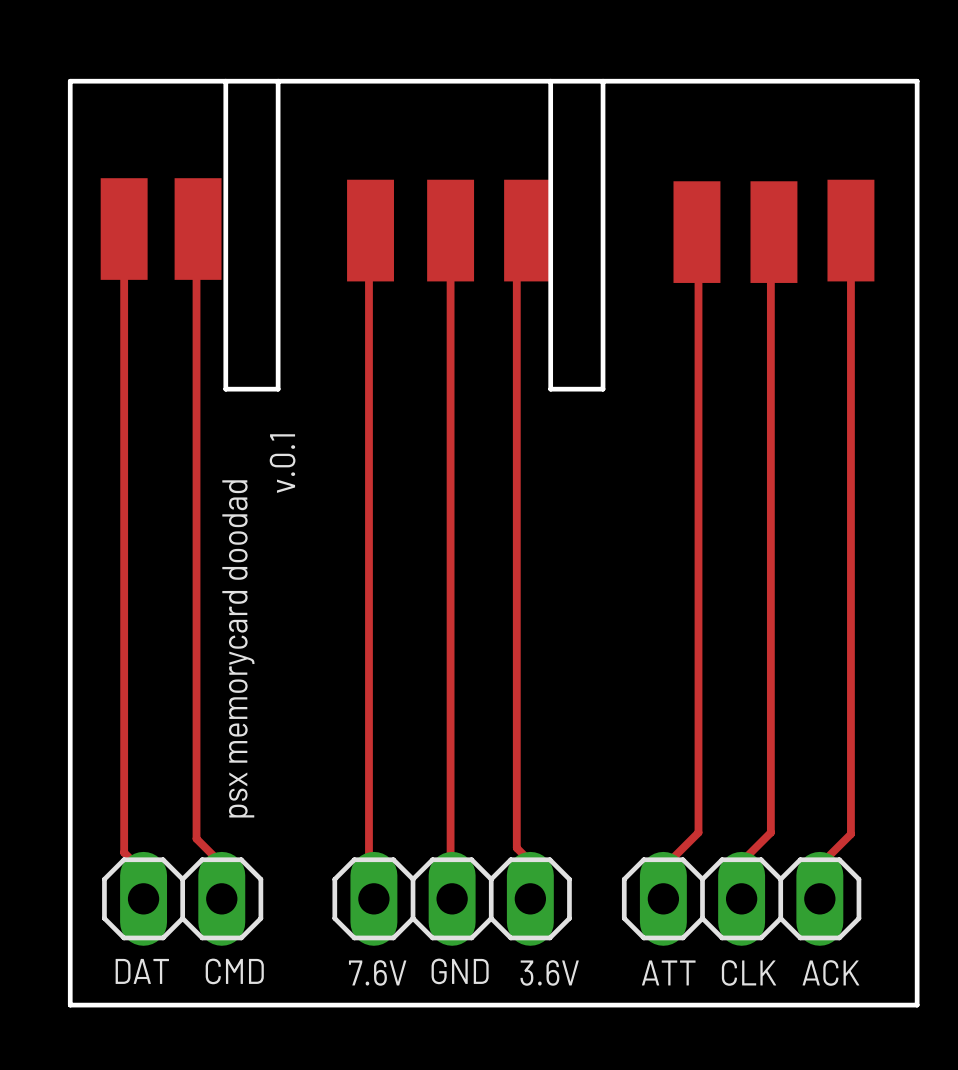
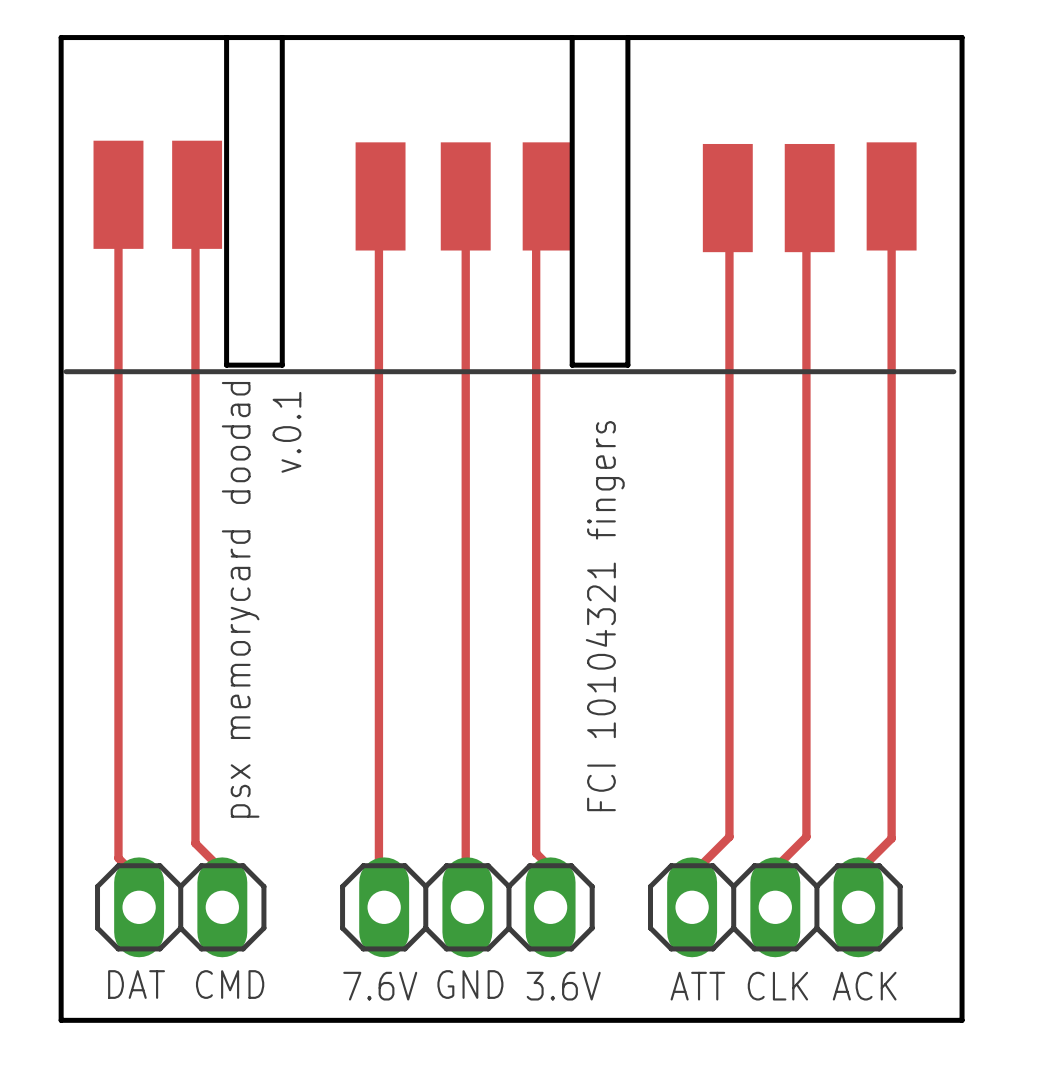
line: none -> (66, 371) (953, 371)
text: none -> FCI 10104321 fingers (605, 616)

